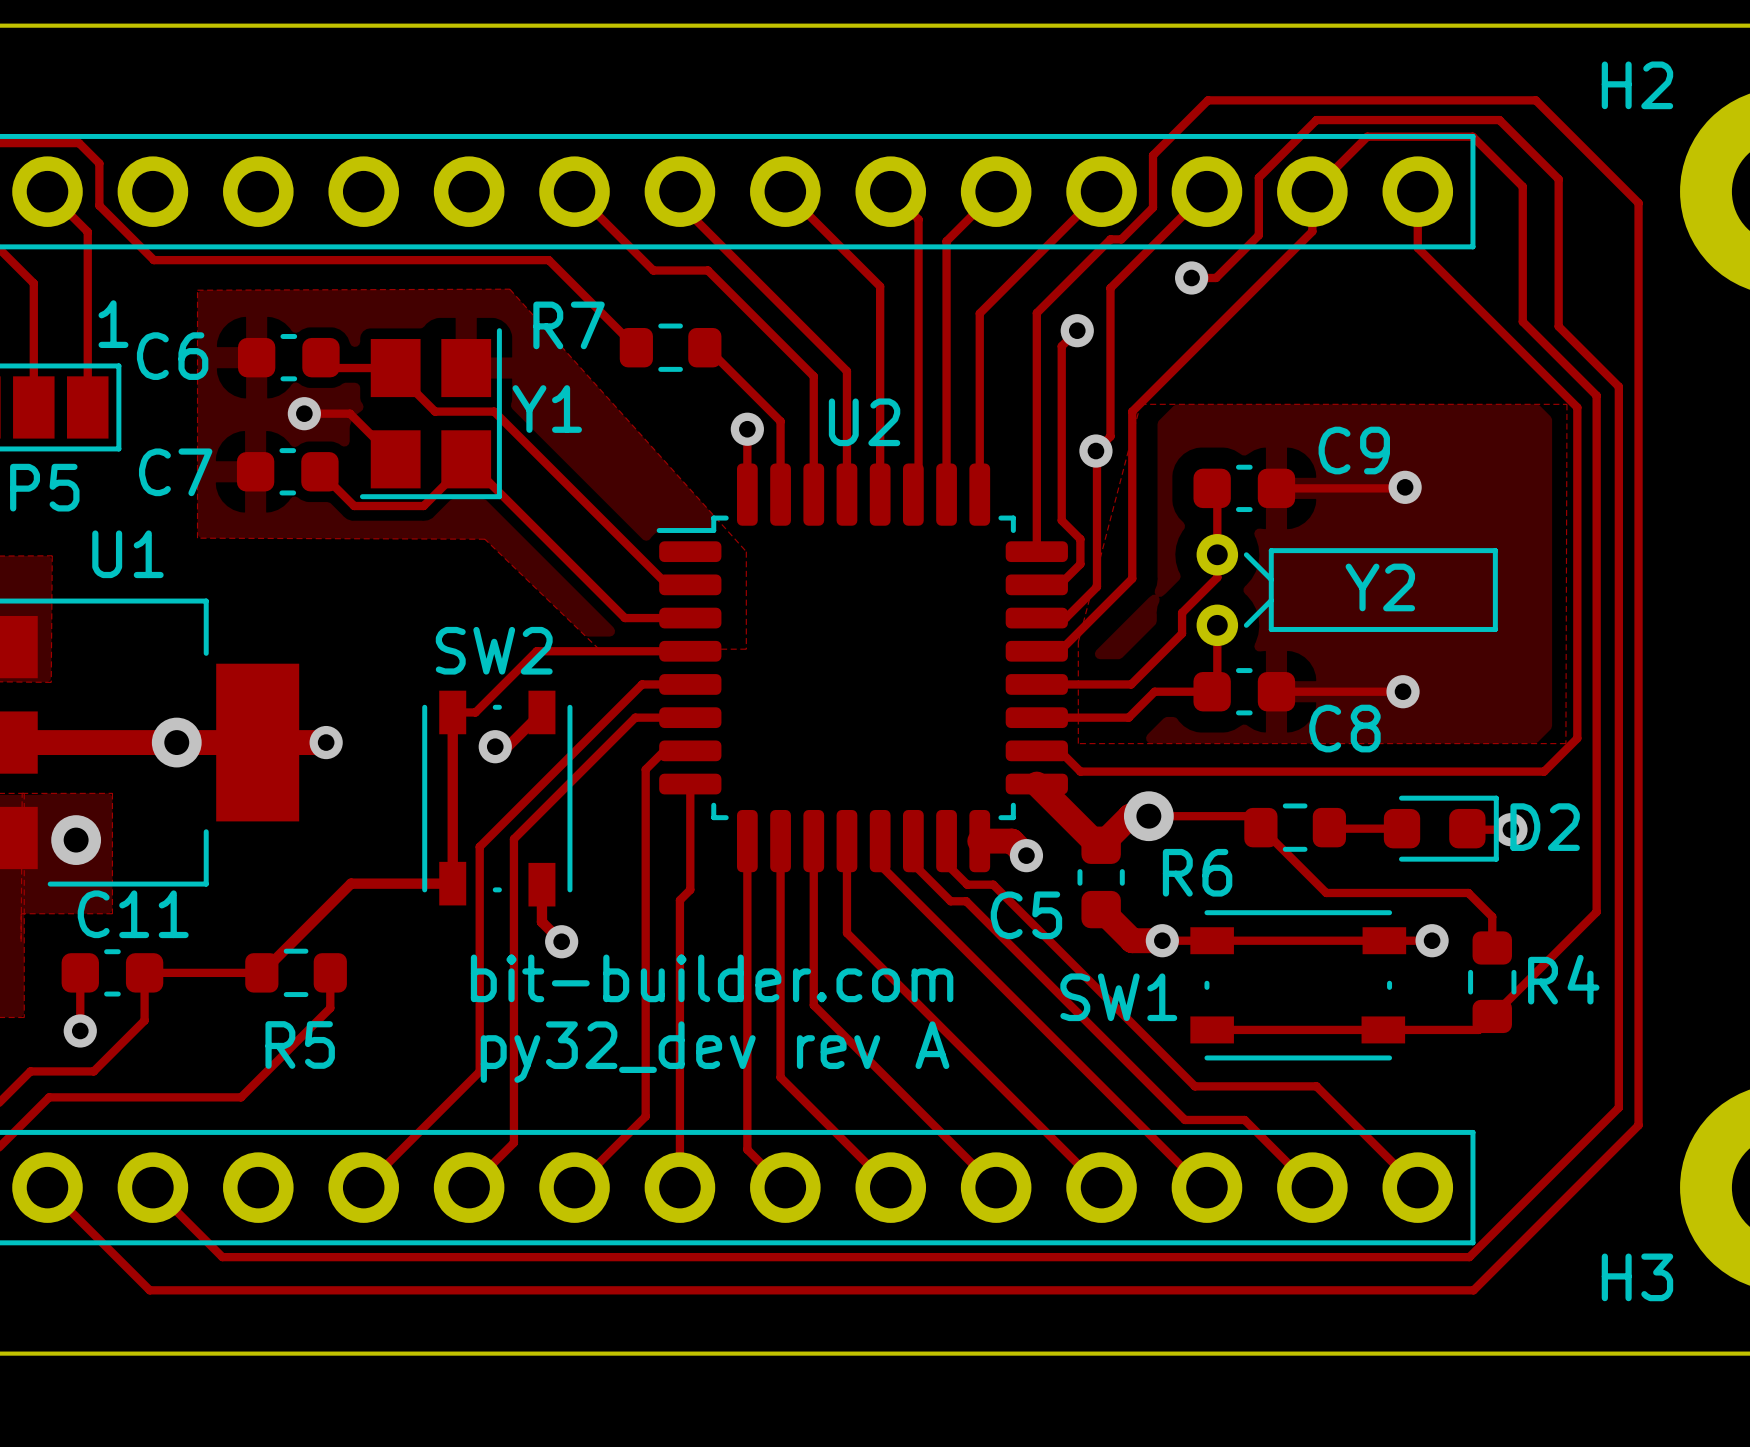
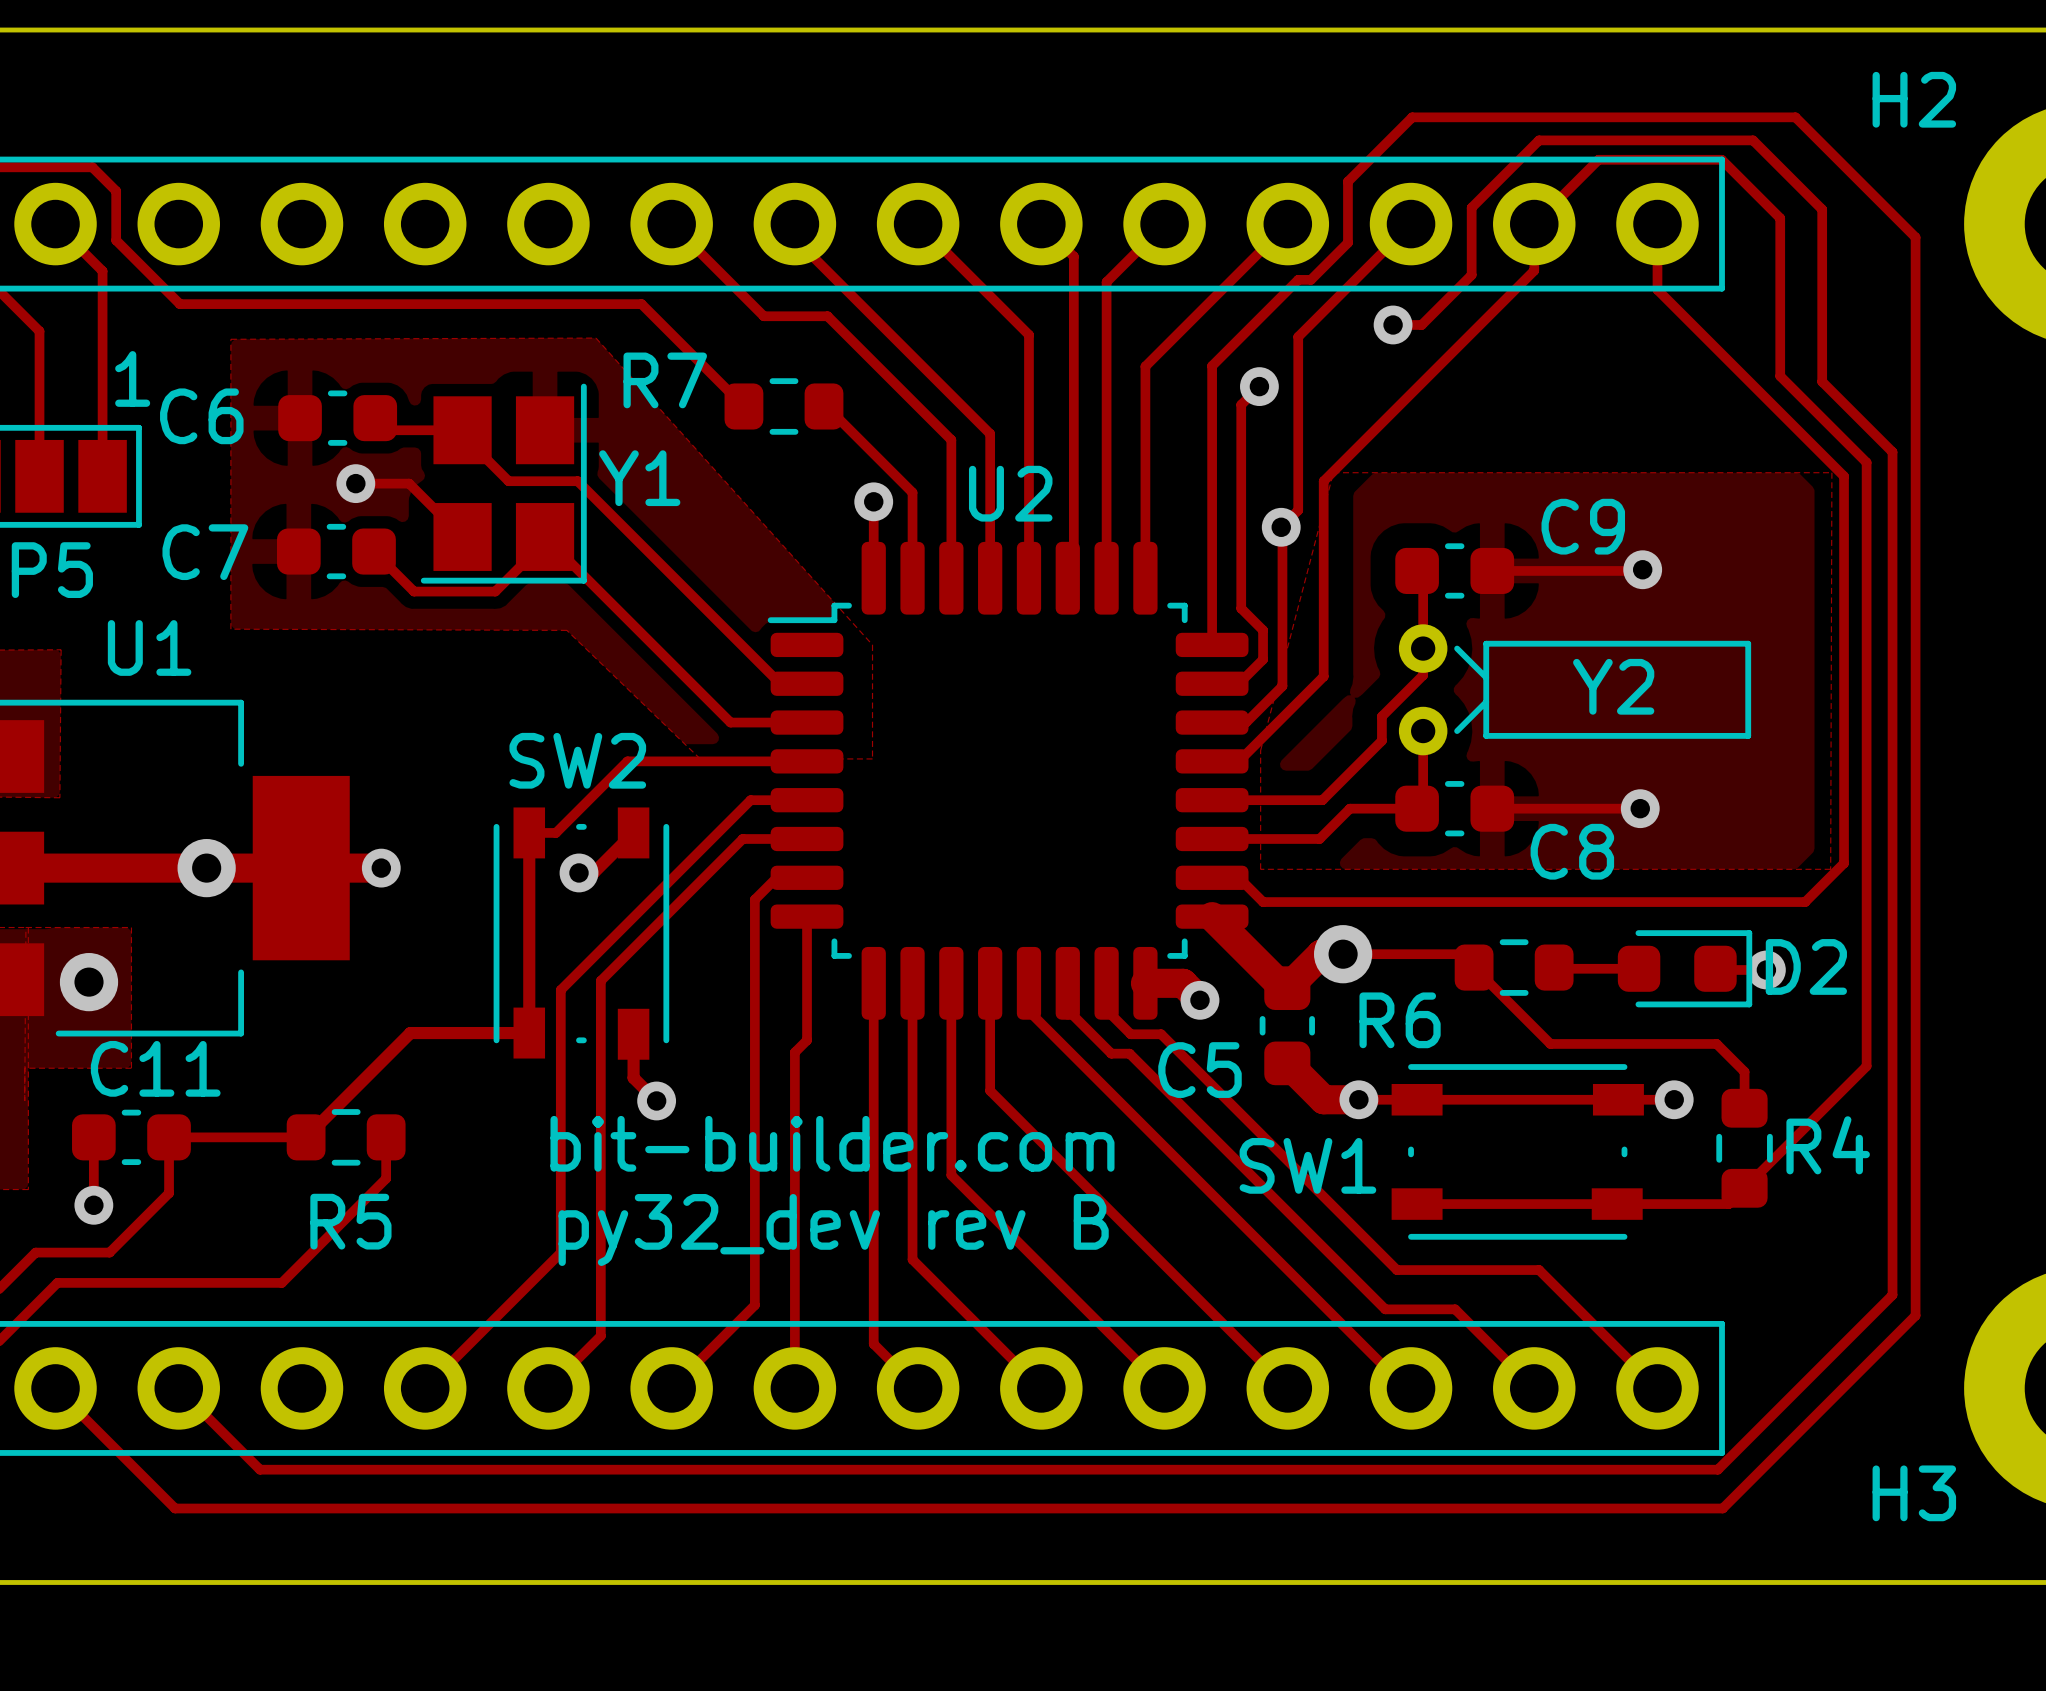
text: py32_dev rev A (715, 1052) -> py32_dev rev B (833, 1229)

